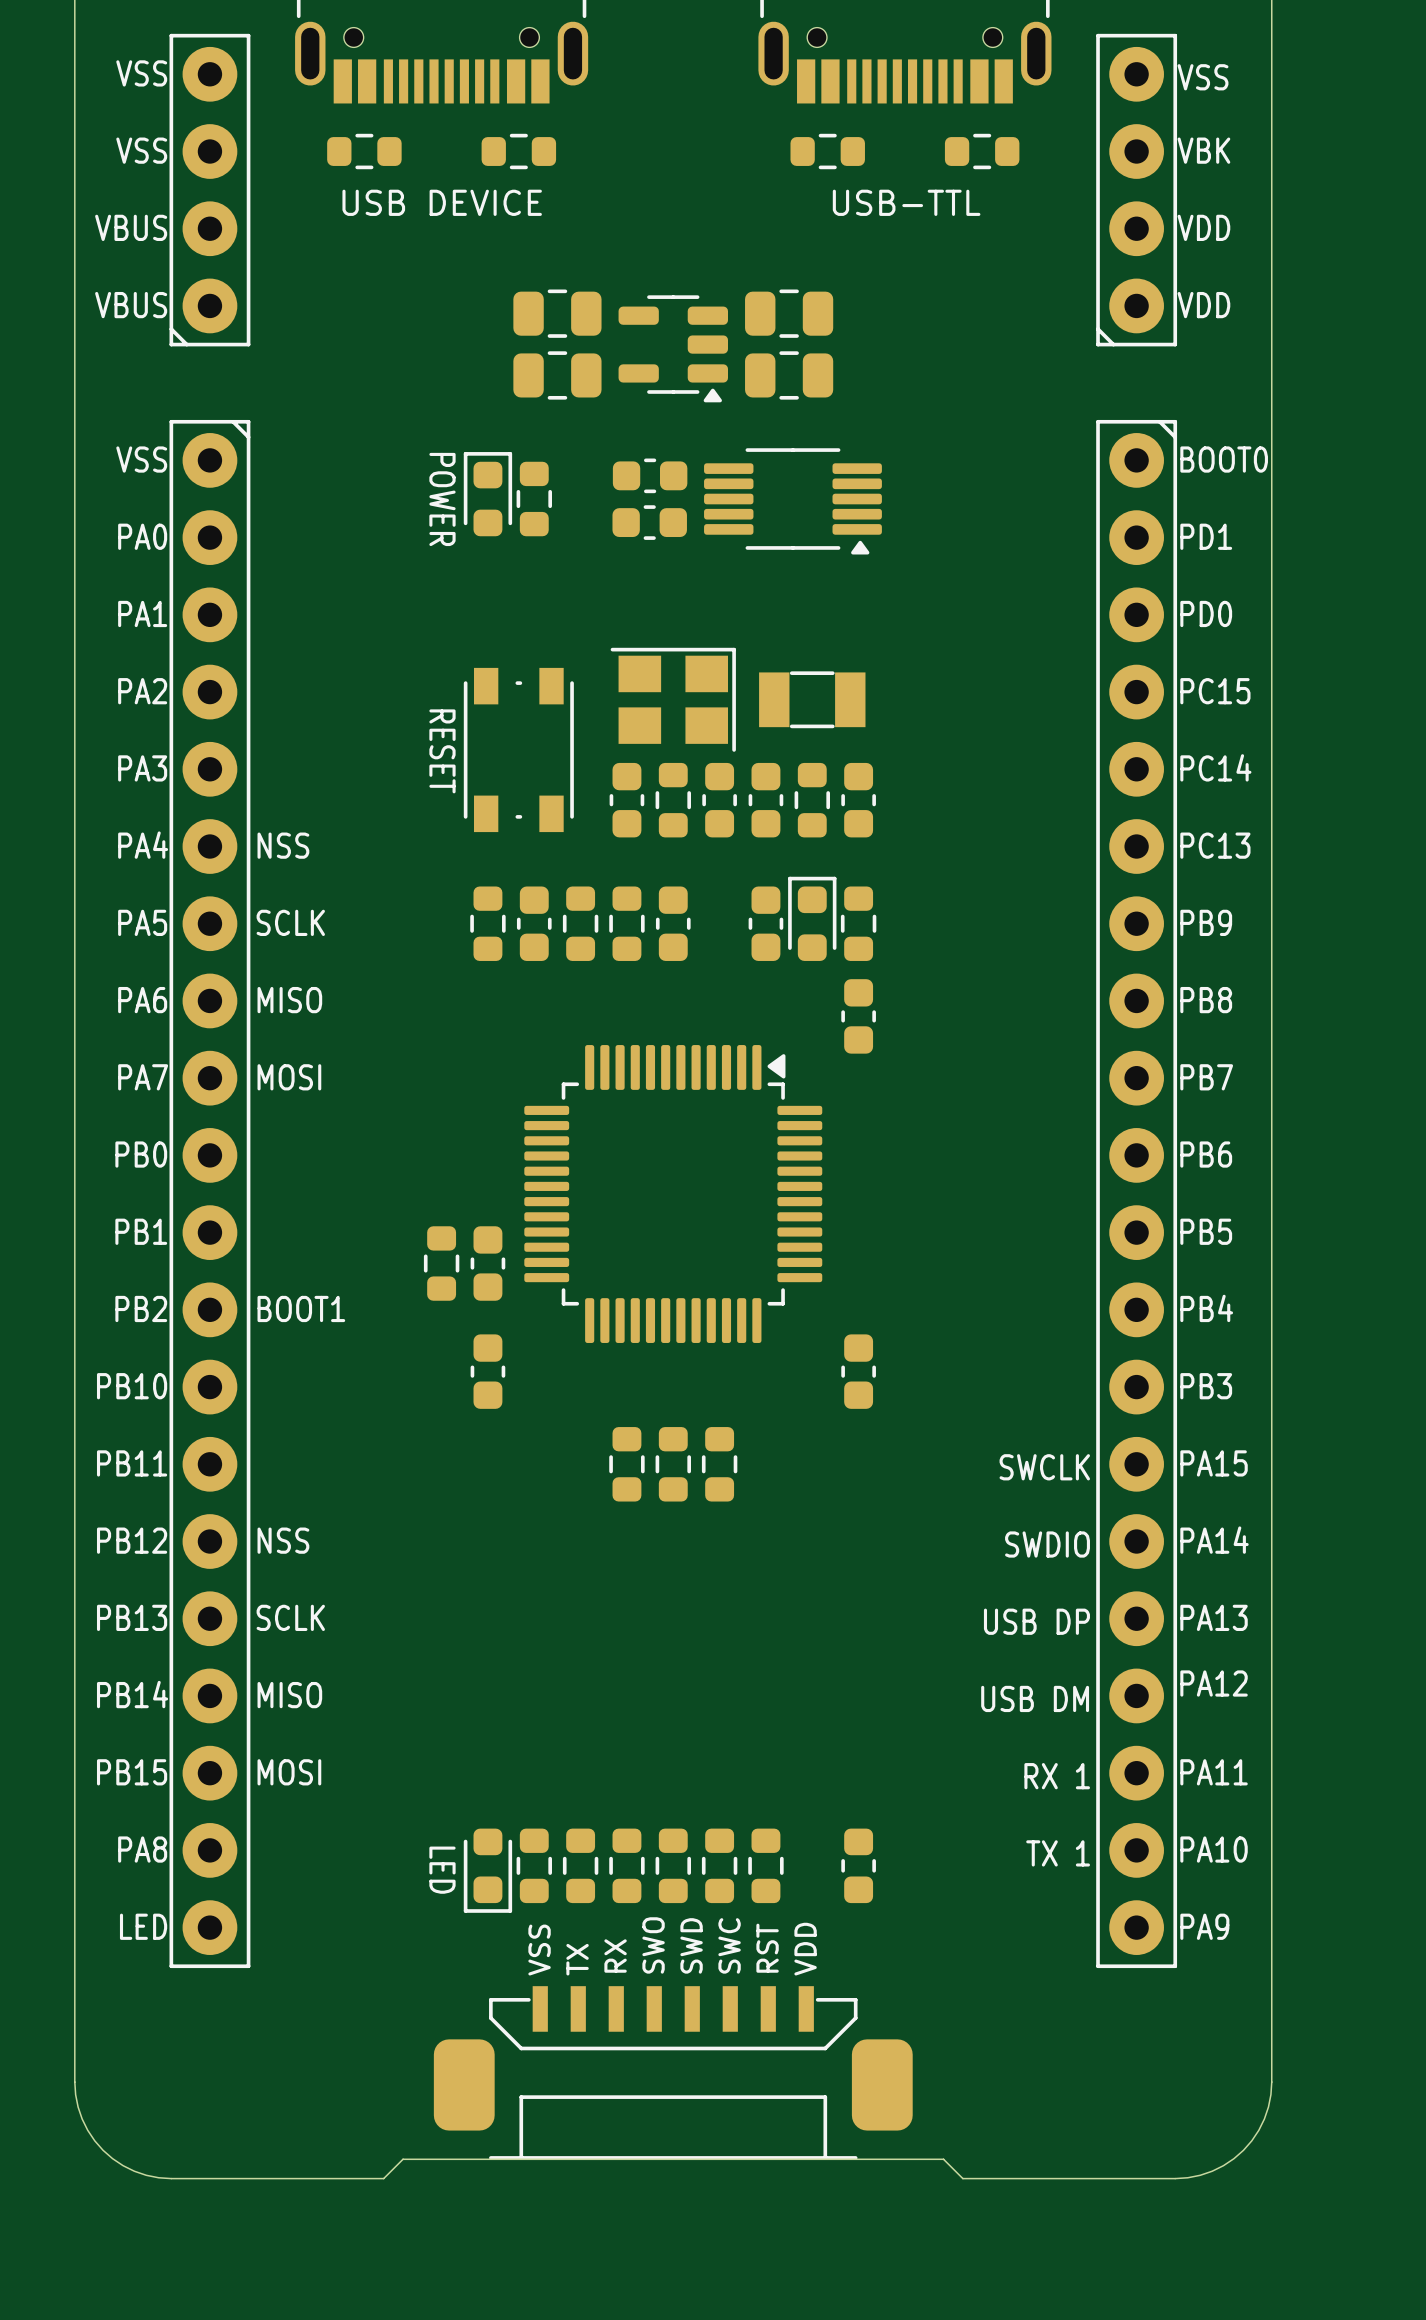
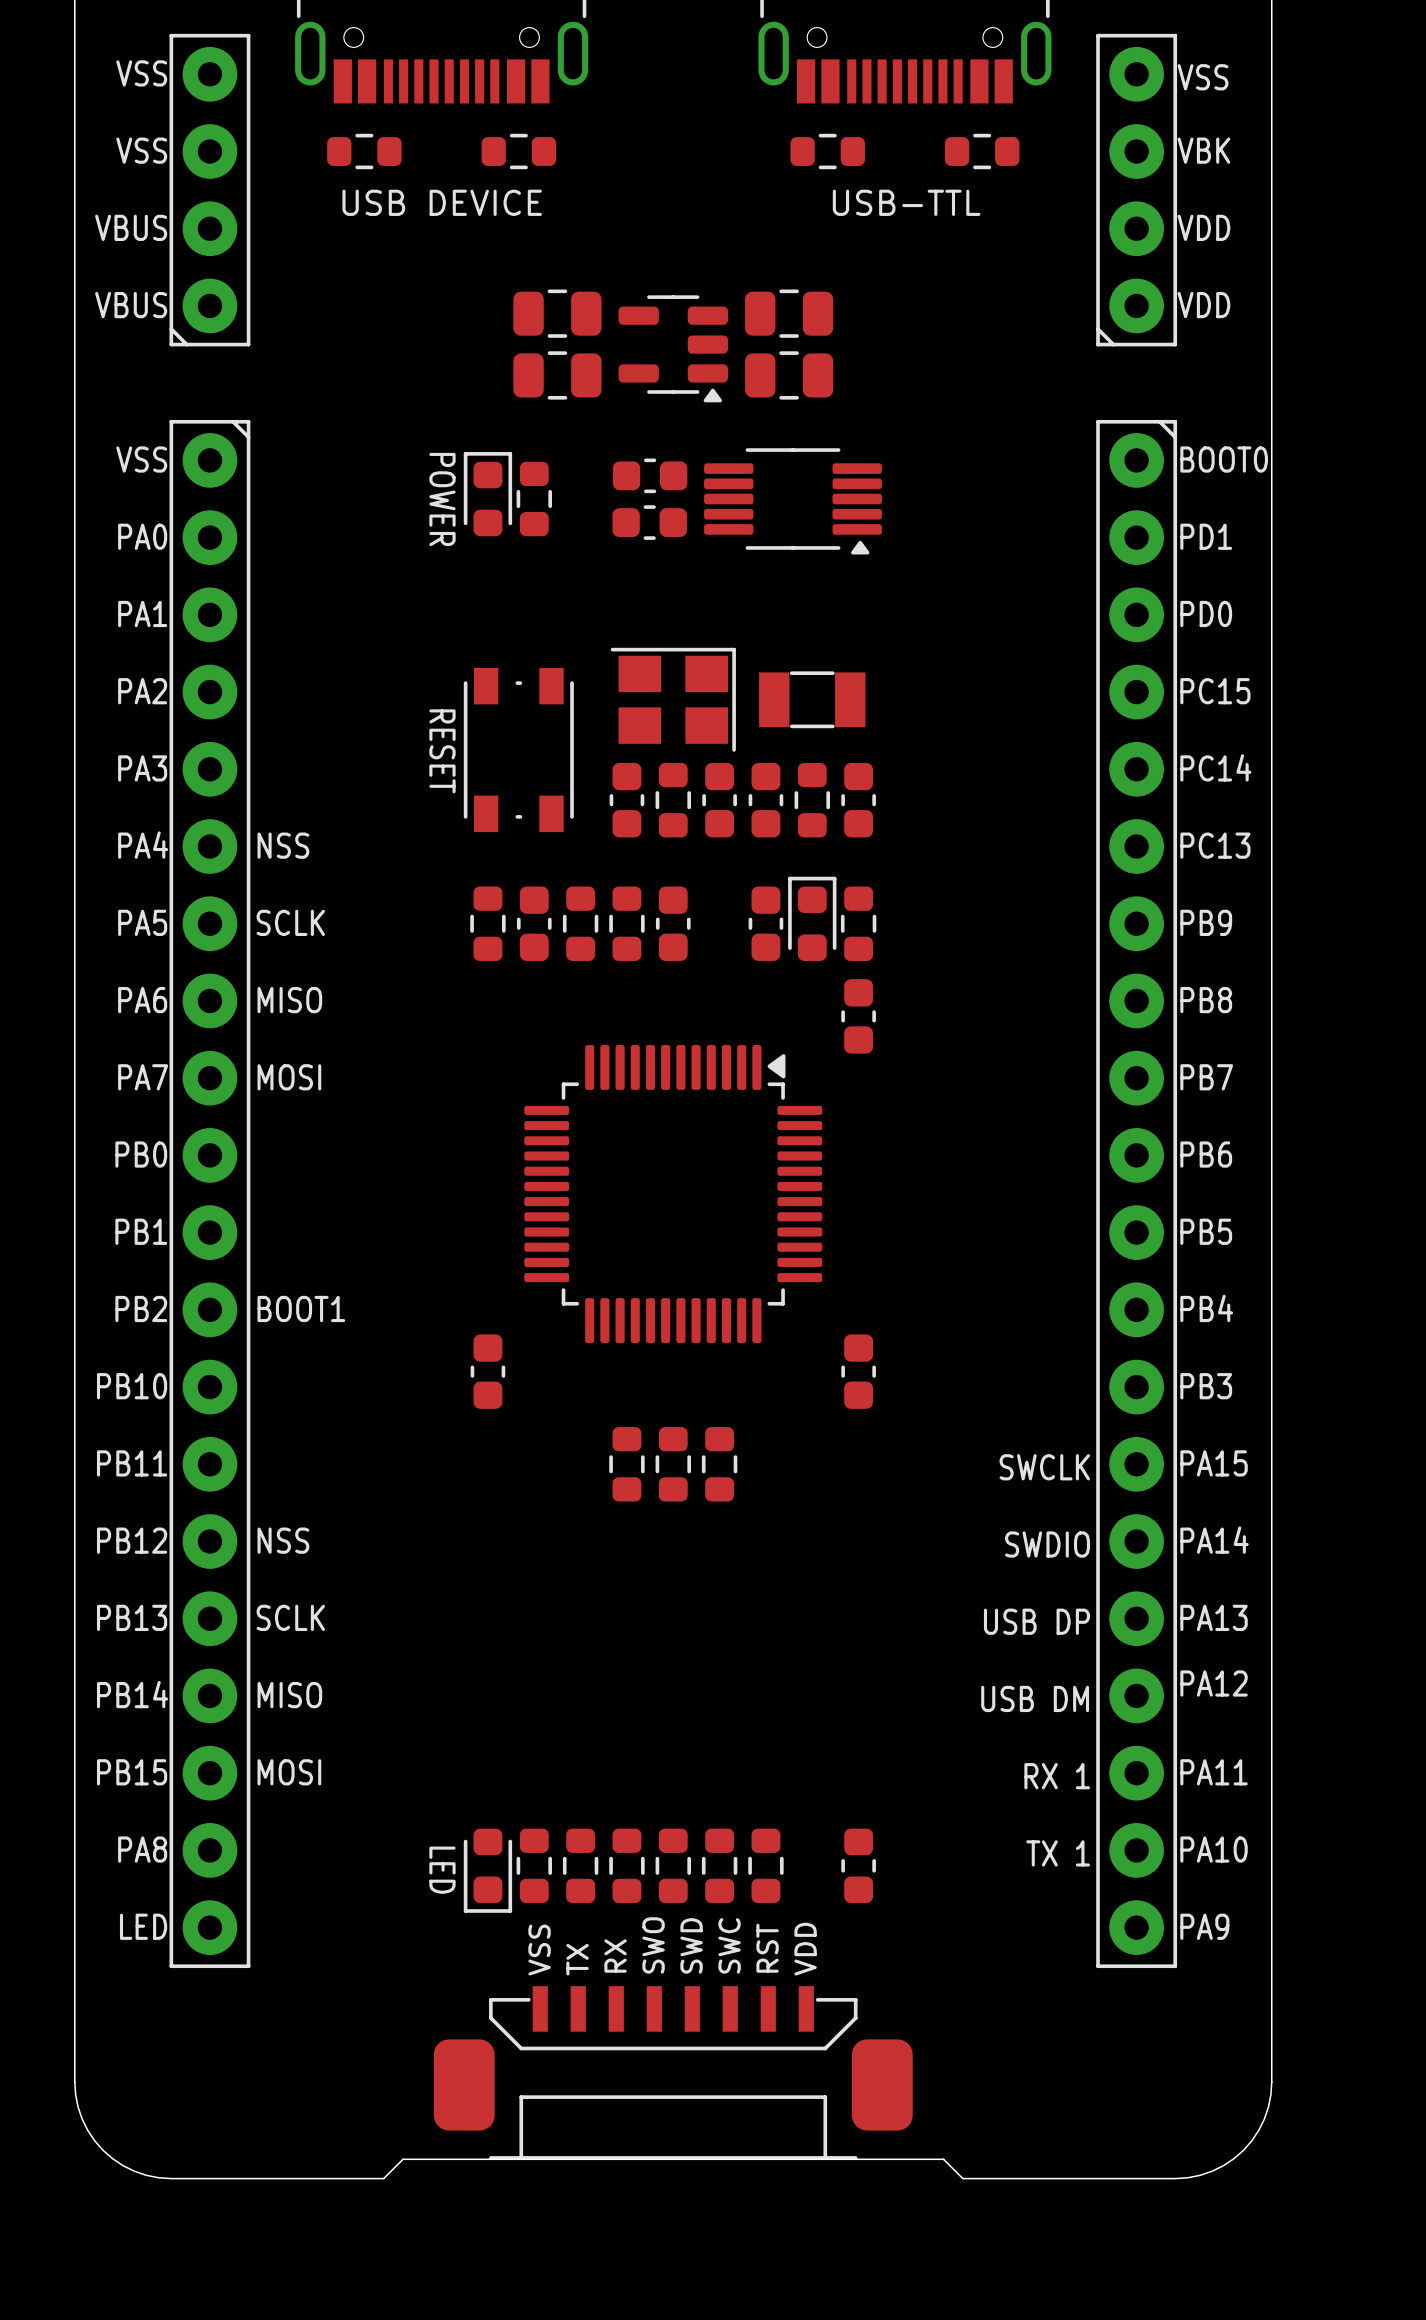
part: (441, 1263) -> none
part: (487, 1263) -> none

